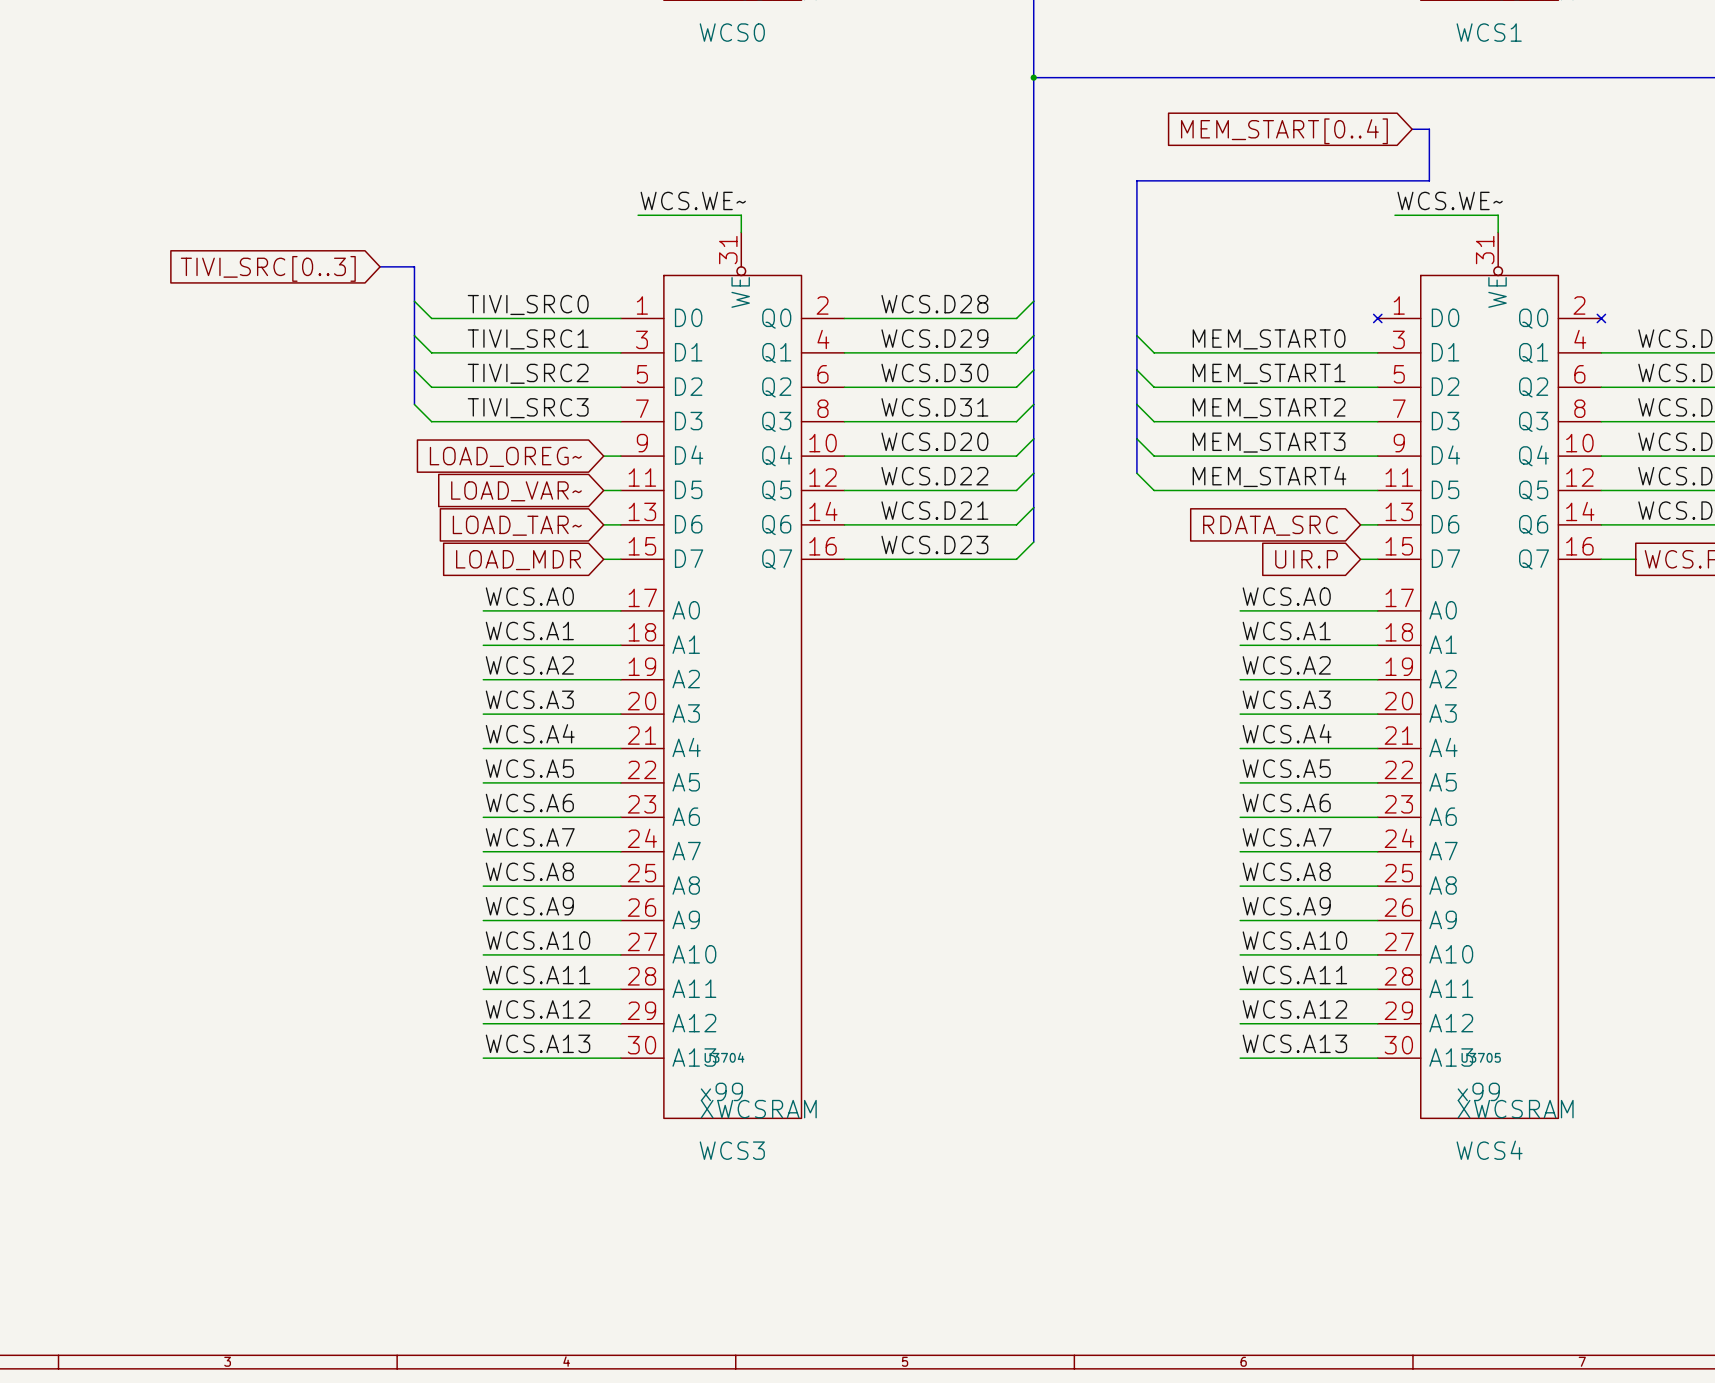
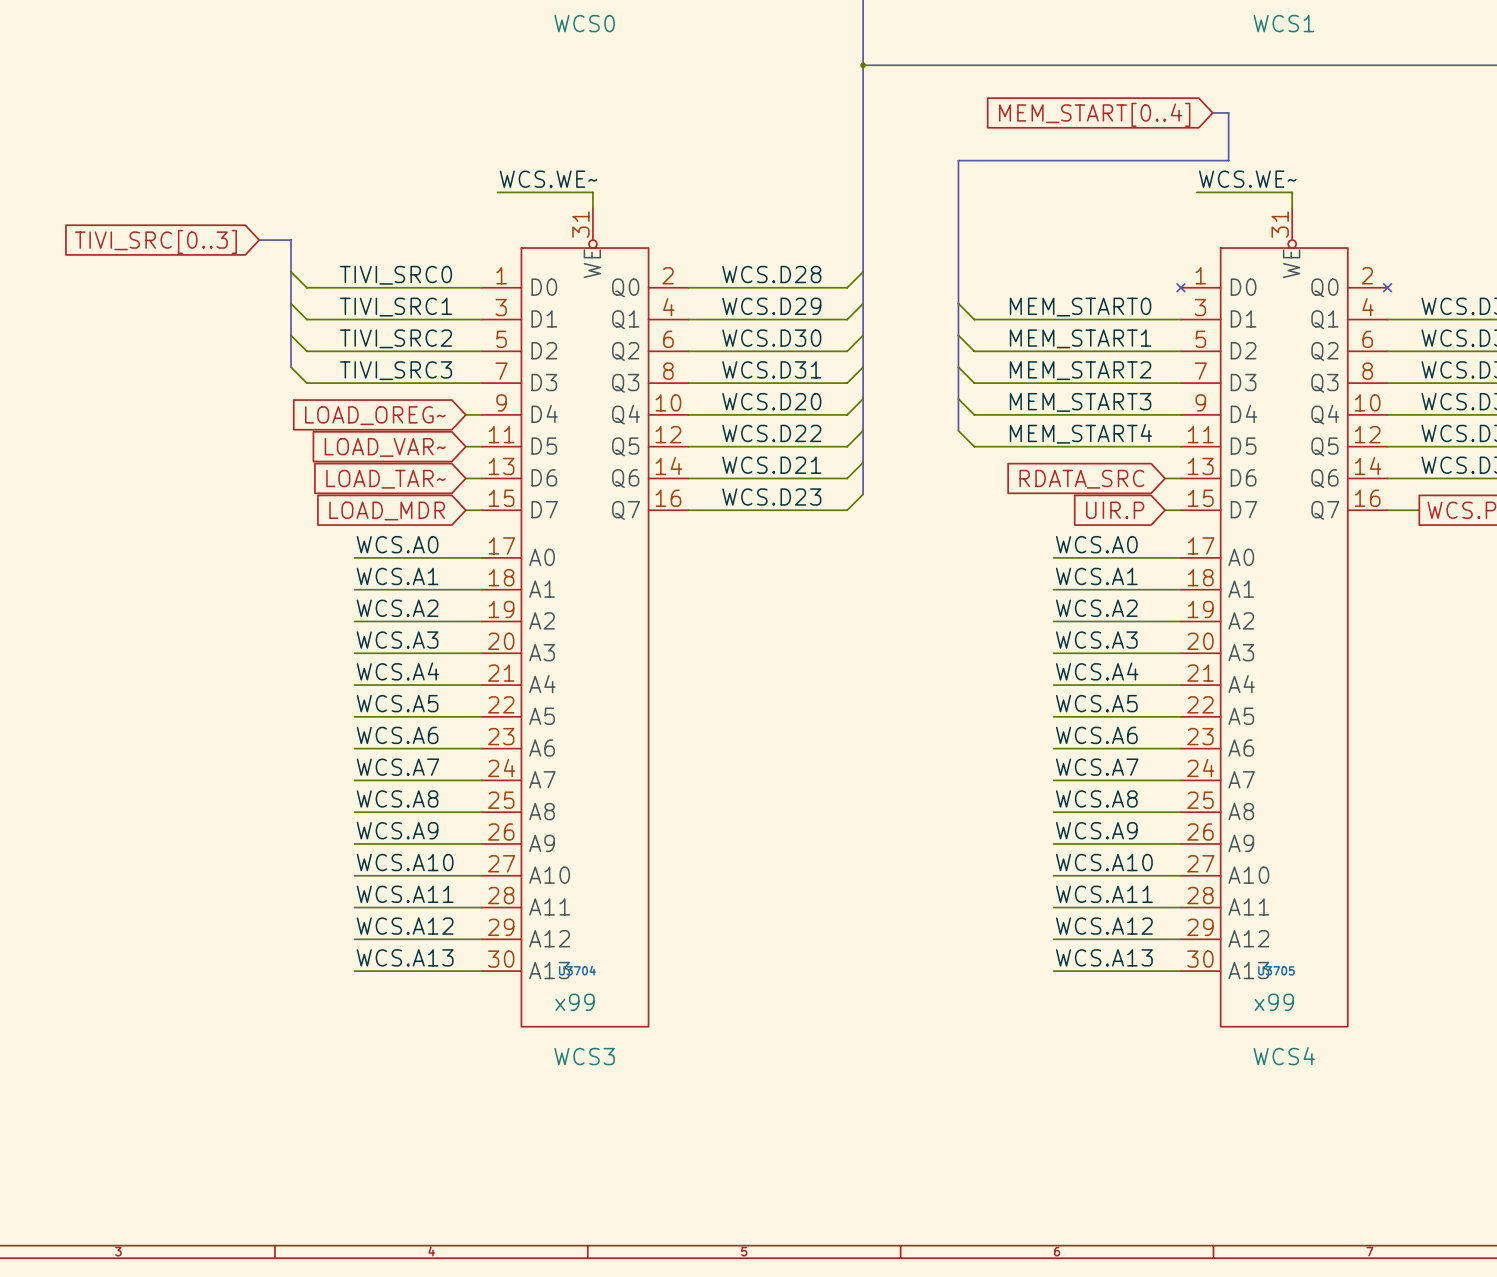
U3704 value: XWCSRAM (758, 1109) -> none
U3705 value: XWCSRAM (1515, 1109) -> none

